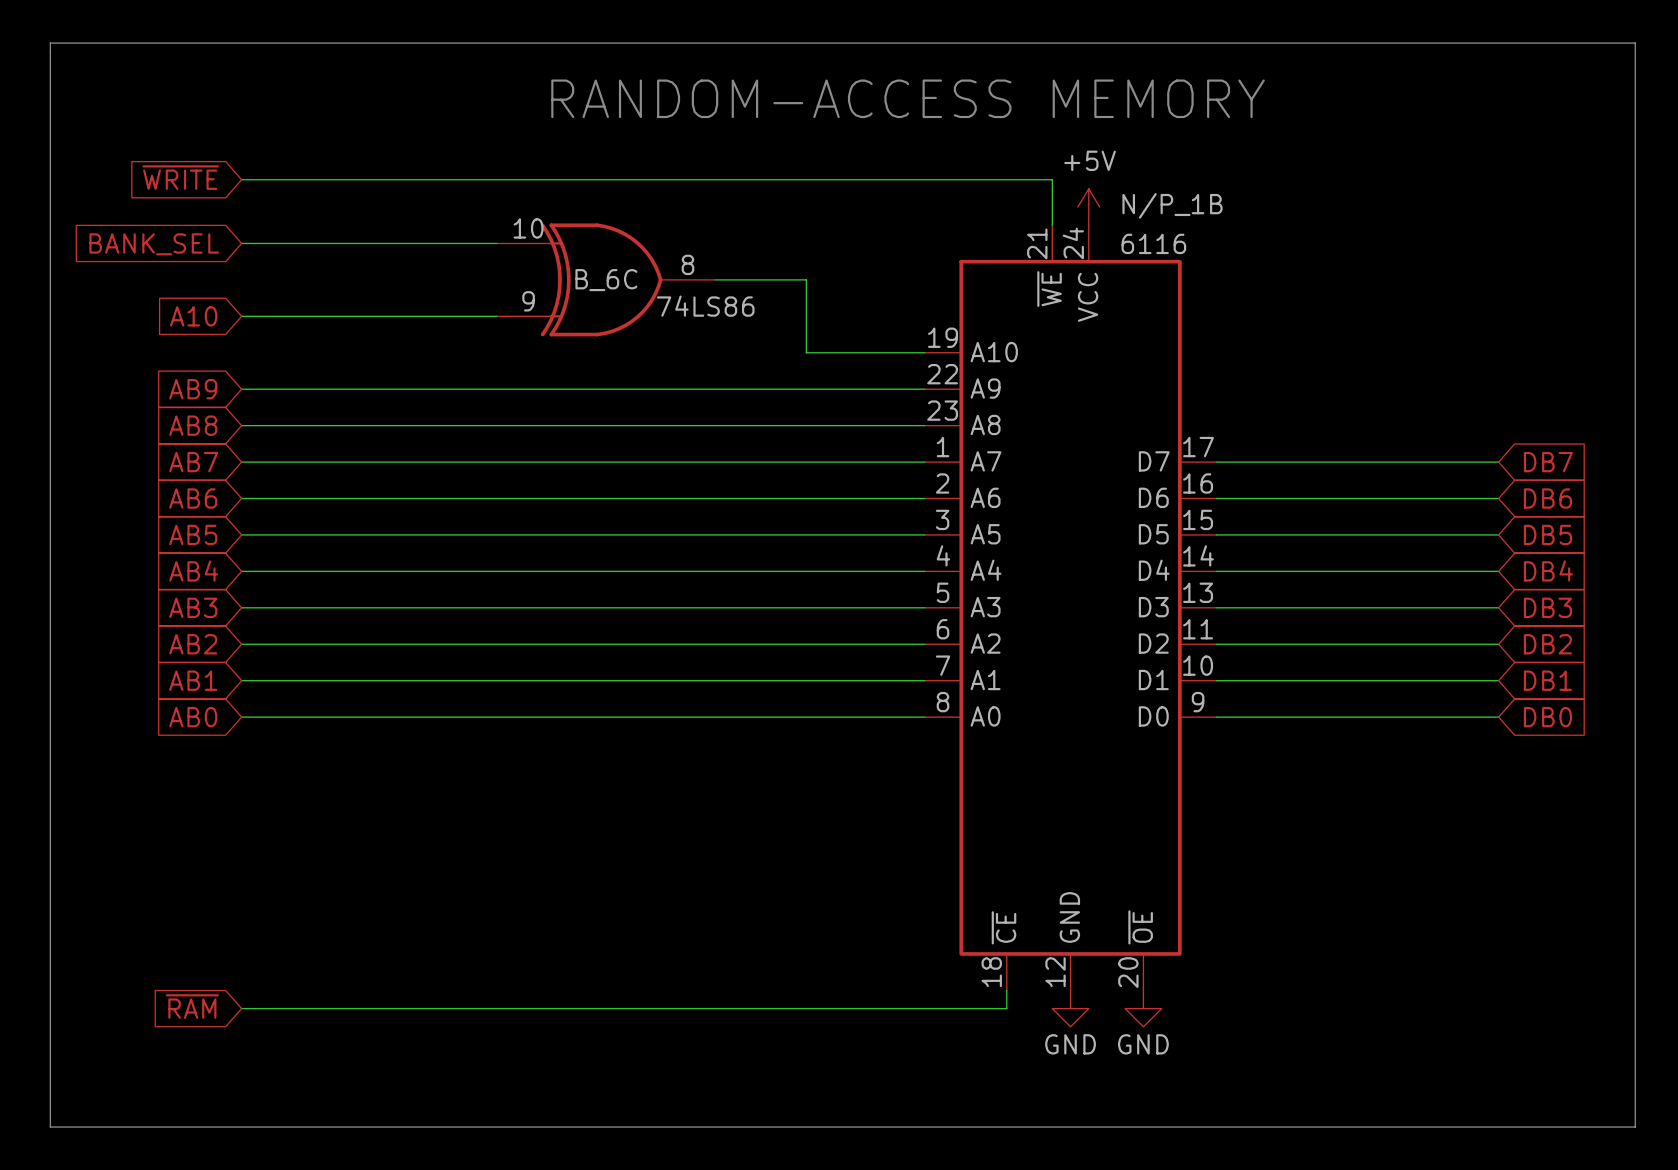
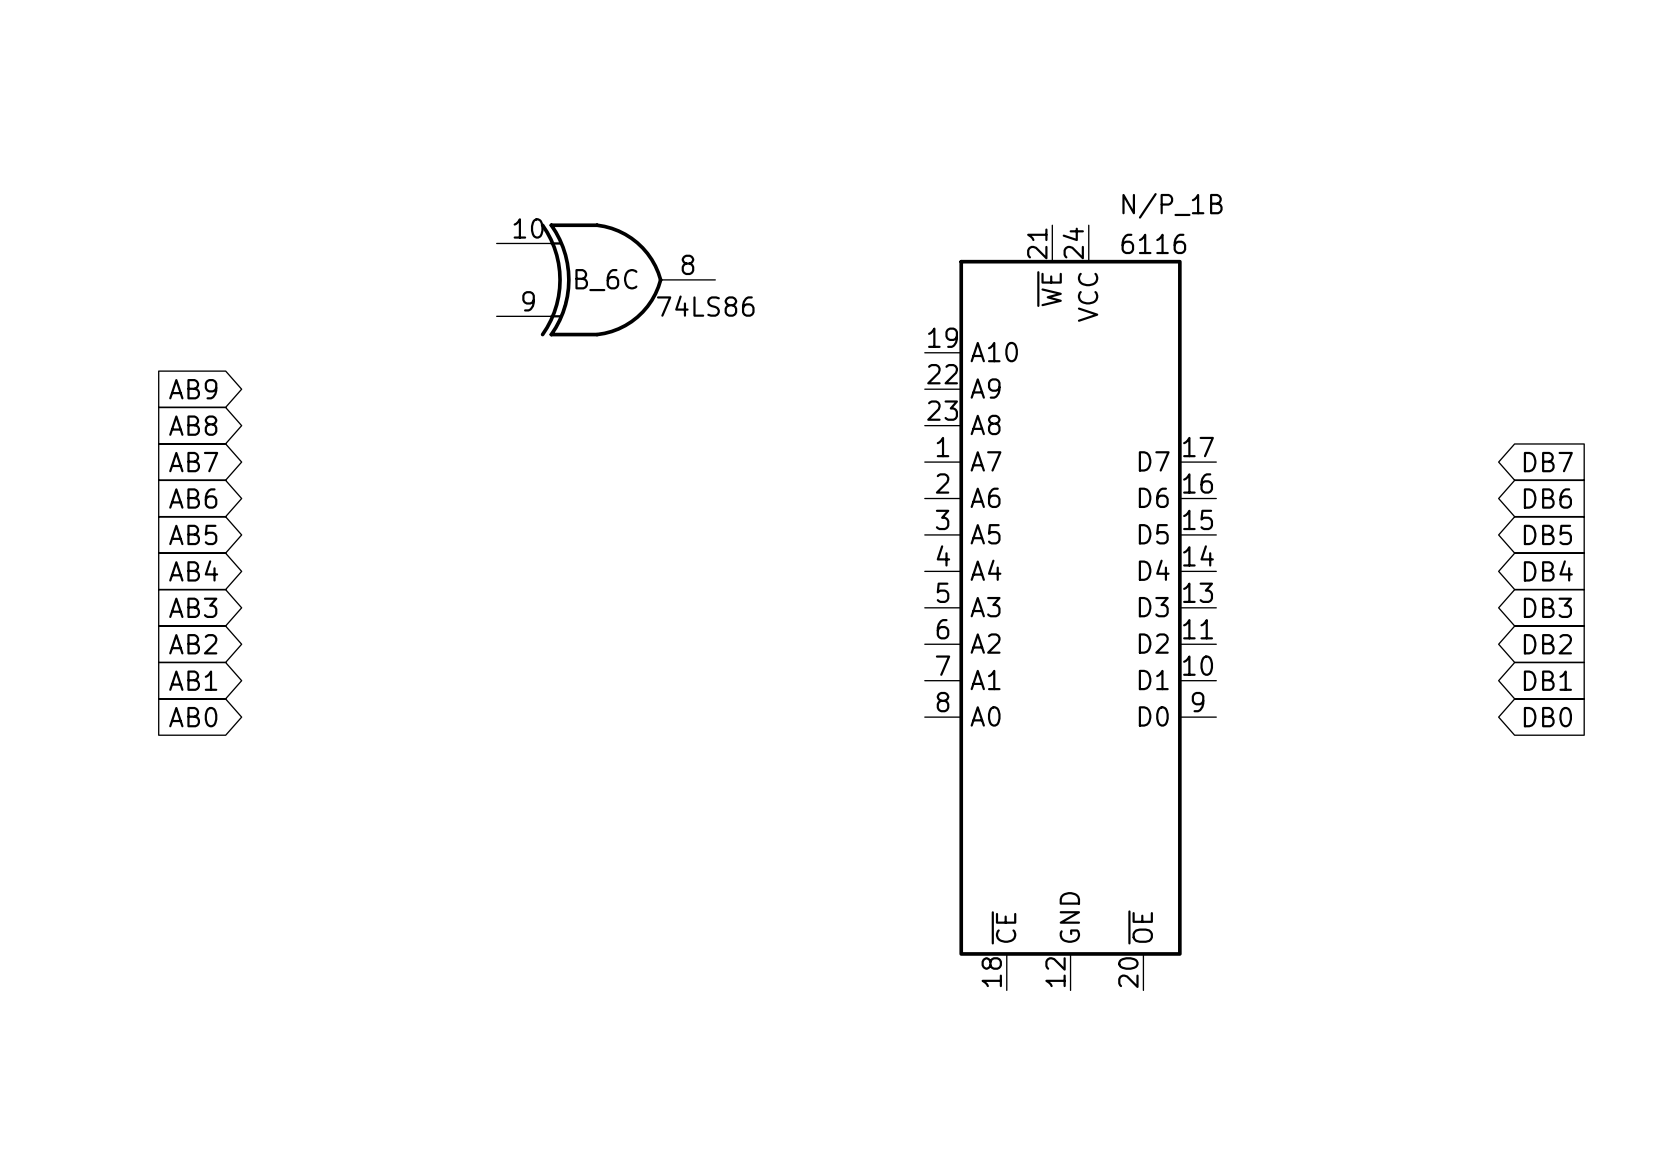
line: (50, 43) (50, 1127) (1635, 1127) (1635, 43) (50, 43) -> none
text: RANDOM-ACCESS MEMORY (908, 98) -> none
global label: ~{WRITE} (180, 177) -> none
wire: (241, 179) (1052, 179) (1052, 225) -> none
power symbol: +5V (1088, 207) -> none
wire: (241, 243) (496, 243) -> none
global label: BANK_SEL (154, 244) -> none
wire: (715, 279) (806, 279) (806, 352) (924, 352) -> none
global label: A10 (193, 316) -> none
wire: (241, 316) (496, 316) -> none
wire: (241, 389) (924, 389) -> none
wire: (241, 425) (924, 425) -> none
wire: (241, 462) (924, 462) -> none
wire: (1216, 462) (1498, 462) -> none
wire: (241, 498) (924, 498) -> none
wire: (1216, 498) (1498, 498) -> none
wire: (241, 534) (924, 534) -> none
wire: (1216, 534) (1498, 534) -> none
wire: (241, 571) (924, 571) -> none
wire: (1216, 571) (1498, 571) -> none
wire: (241, 607) (924, 607) -> none
wire: (1216, 607) (1498, 607) -> none
wire: (241, 644) (924, 644) -> none
wire: (1216, 644) (1498, 644) -> none
wire: (241, 680) (924, 680) -> none
wire: (1216, 680) (1498, 680) -> none
wire: (241, 717) (924, 717) -> none
wire: (1216, 717) (1498, 717) -> none
wire: (1006, 990) (1006, 1008) (241, 1008) -> none
global label: ~{RAM} (192, 1006) -> none
power symbol: GND (1070, 1008) -> none
power symbol: GND (1143, 1008) -> none

